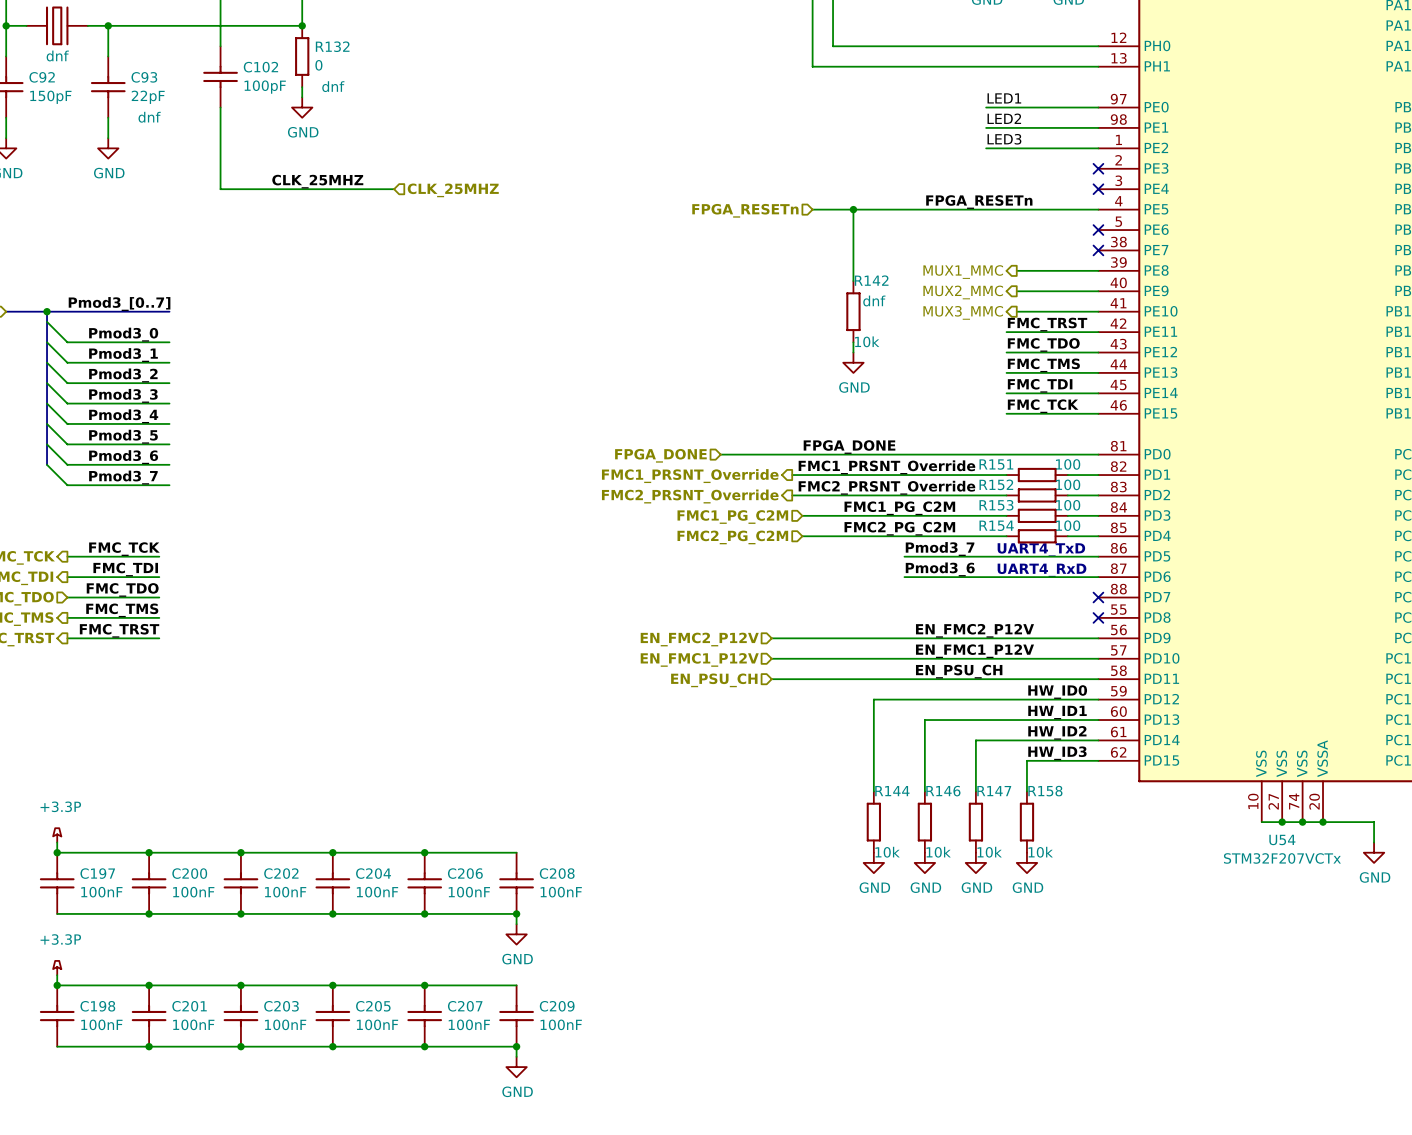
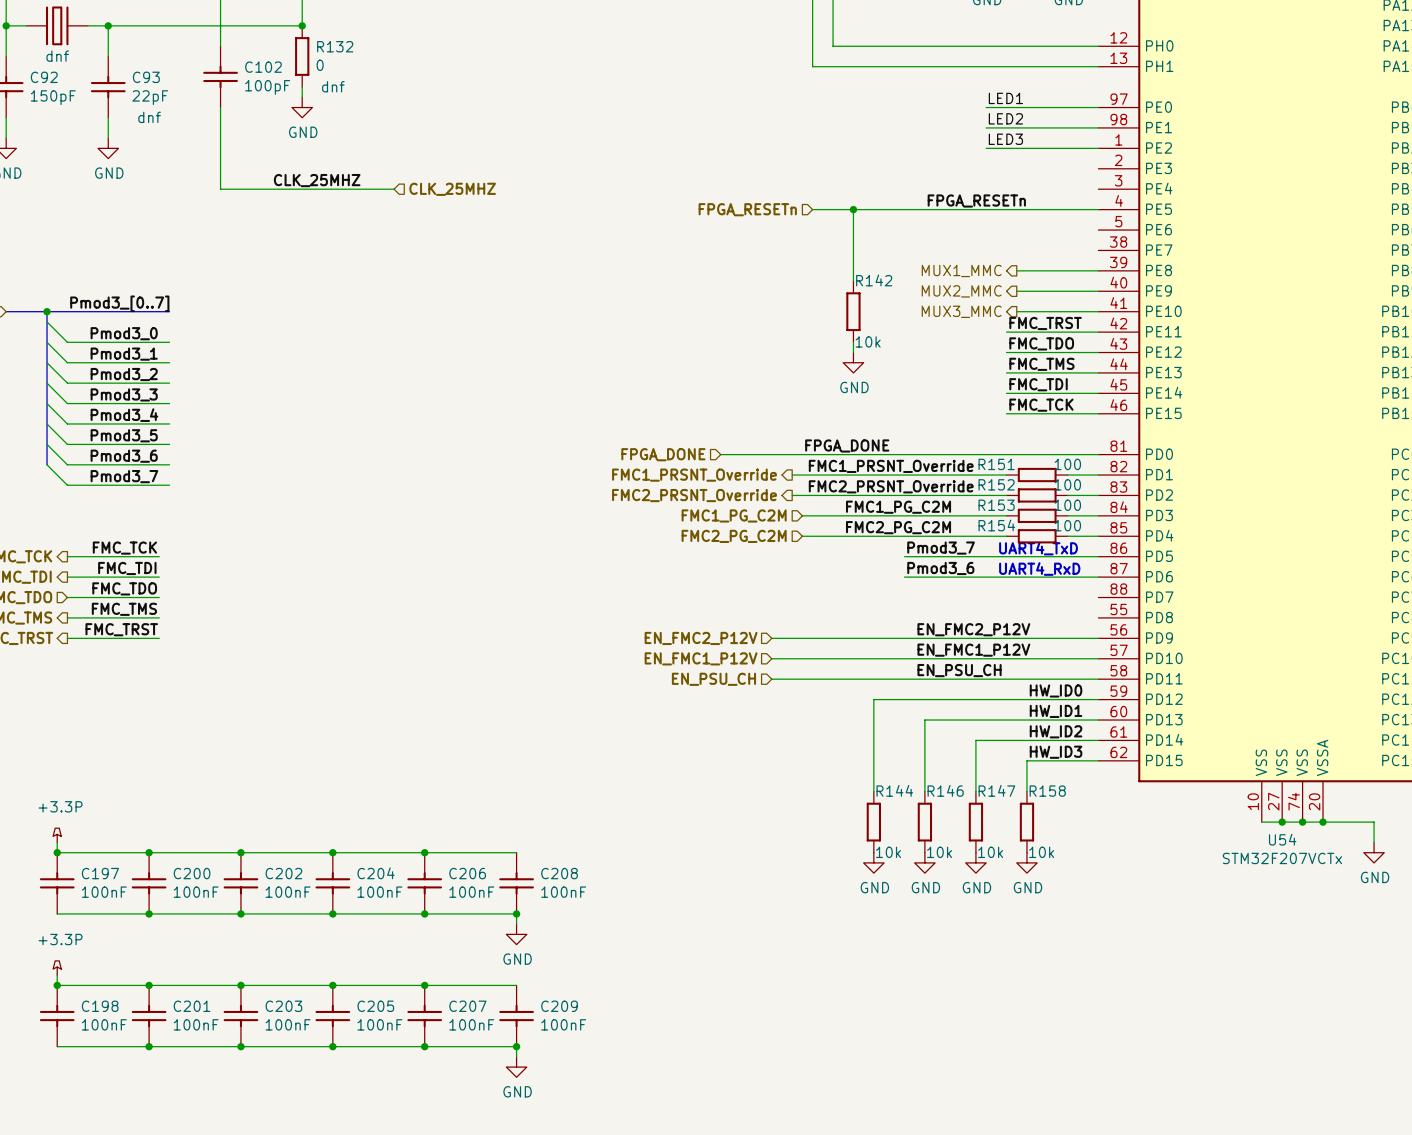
no-connect mark: (1098, 168) -> none
no-connect mark: (1098, 189) -> none
no-connect mark: (1098, 230) -> none
no-connect mark: (1098, 250) -> none
R142 text: dnf (874, 300) -> none
no-connect mark: (1098, 597) -> none
no-connect mark: (1098, 617) -> none

